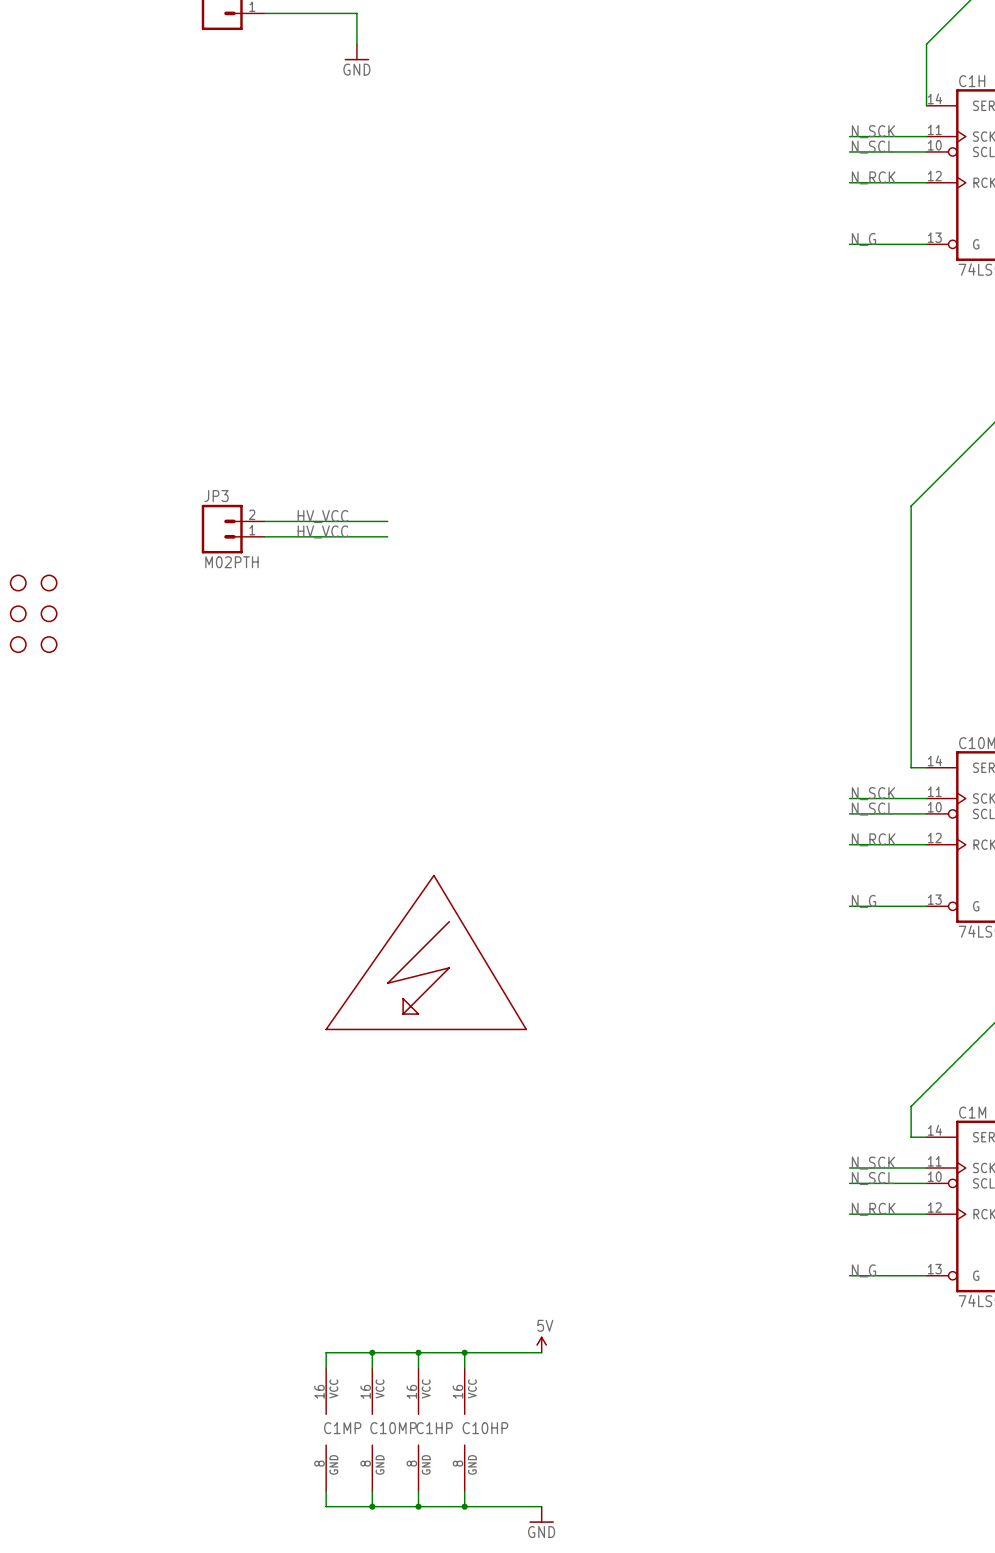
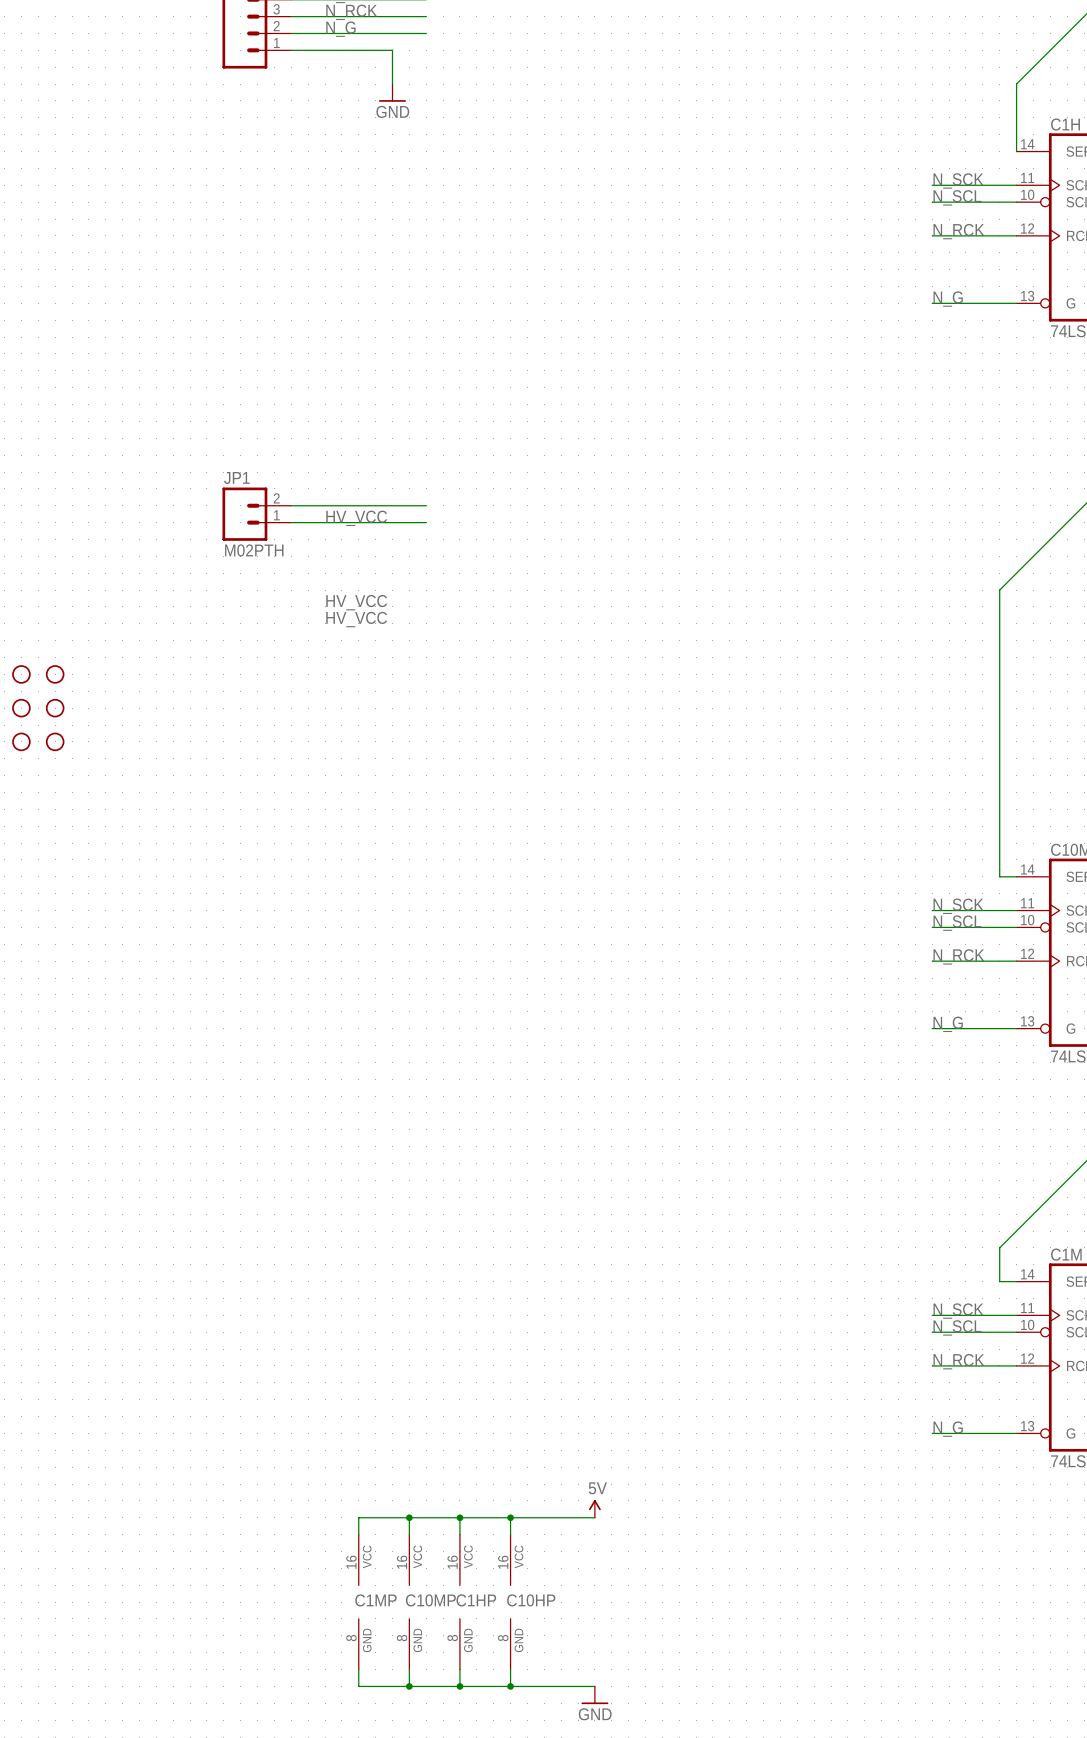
JP1: none -> M02PTH (256, 514)
label: none -> HV_VCC (356, 518)
wire: (264, 521) (387, 521) -> (291, 505) (426, 505)
JP3: M02PTH (233, 529) -> none
wire: (264, 536) (387, 536) -> (291, 522) (426, 522)
part: (426, 952) -> none

